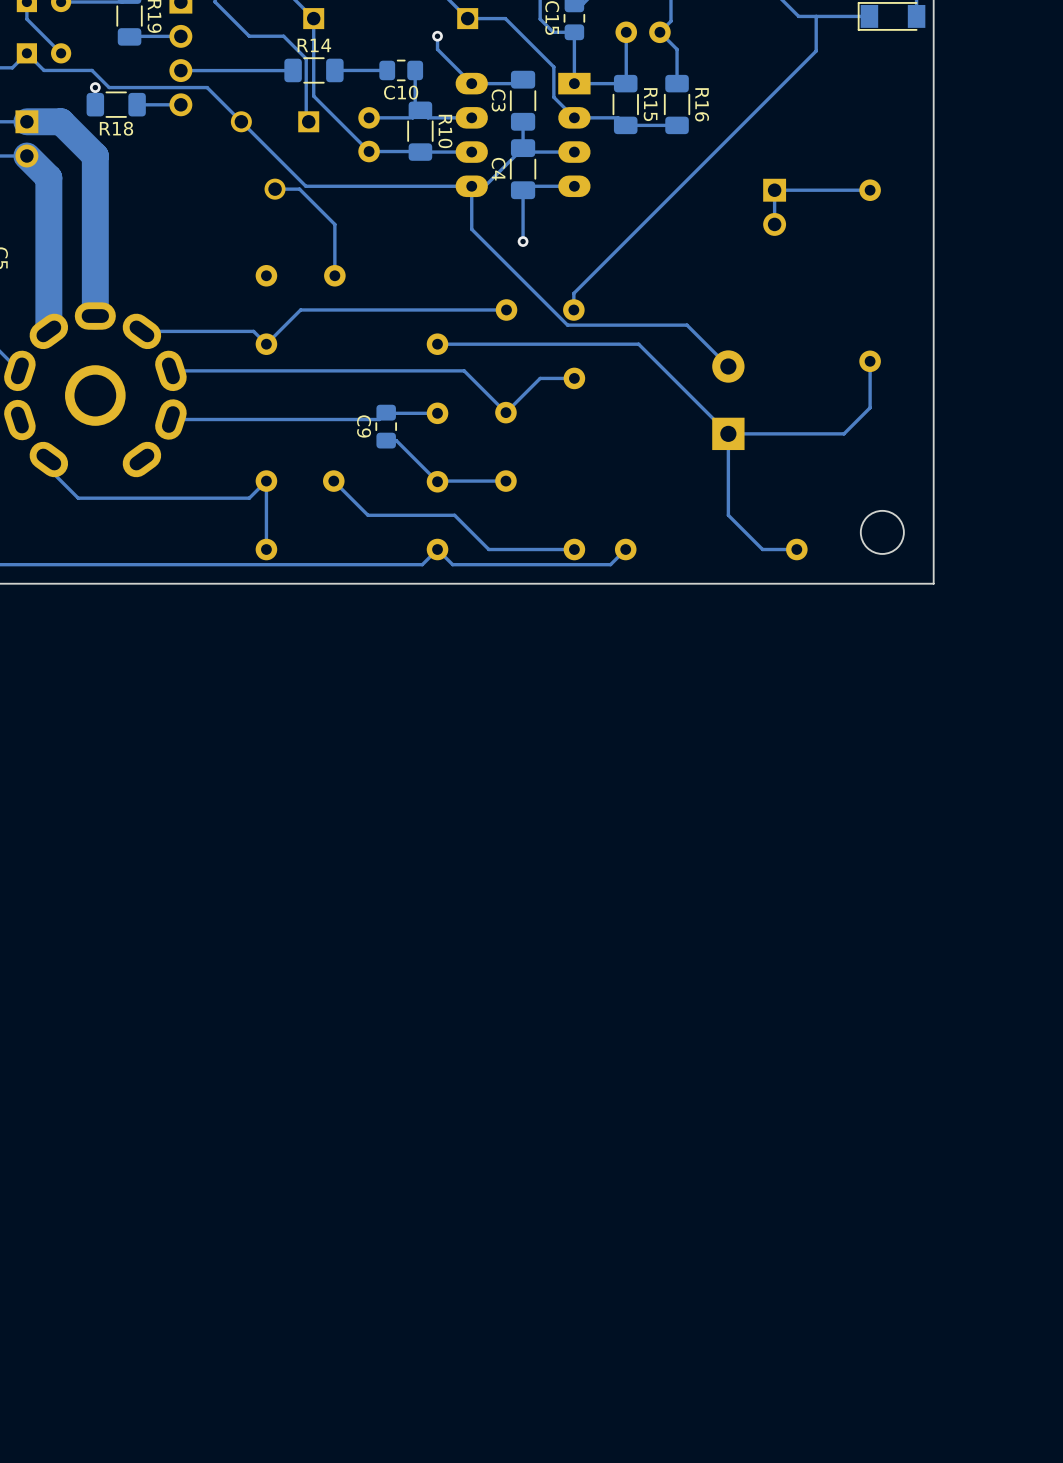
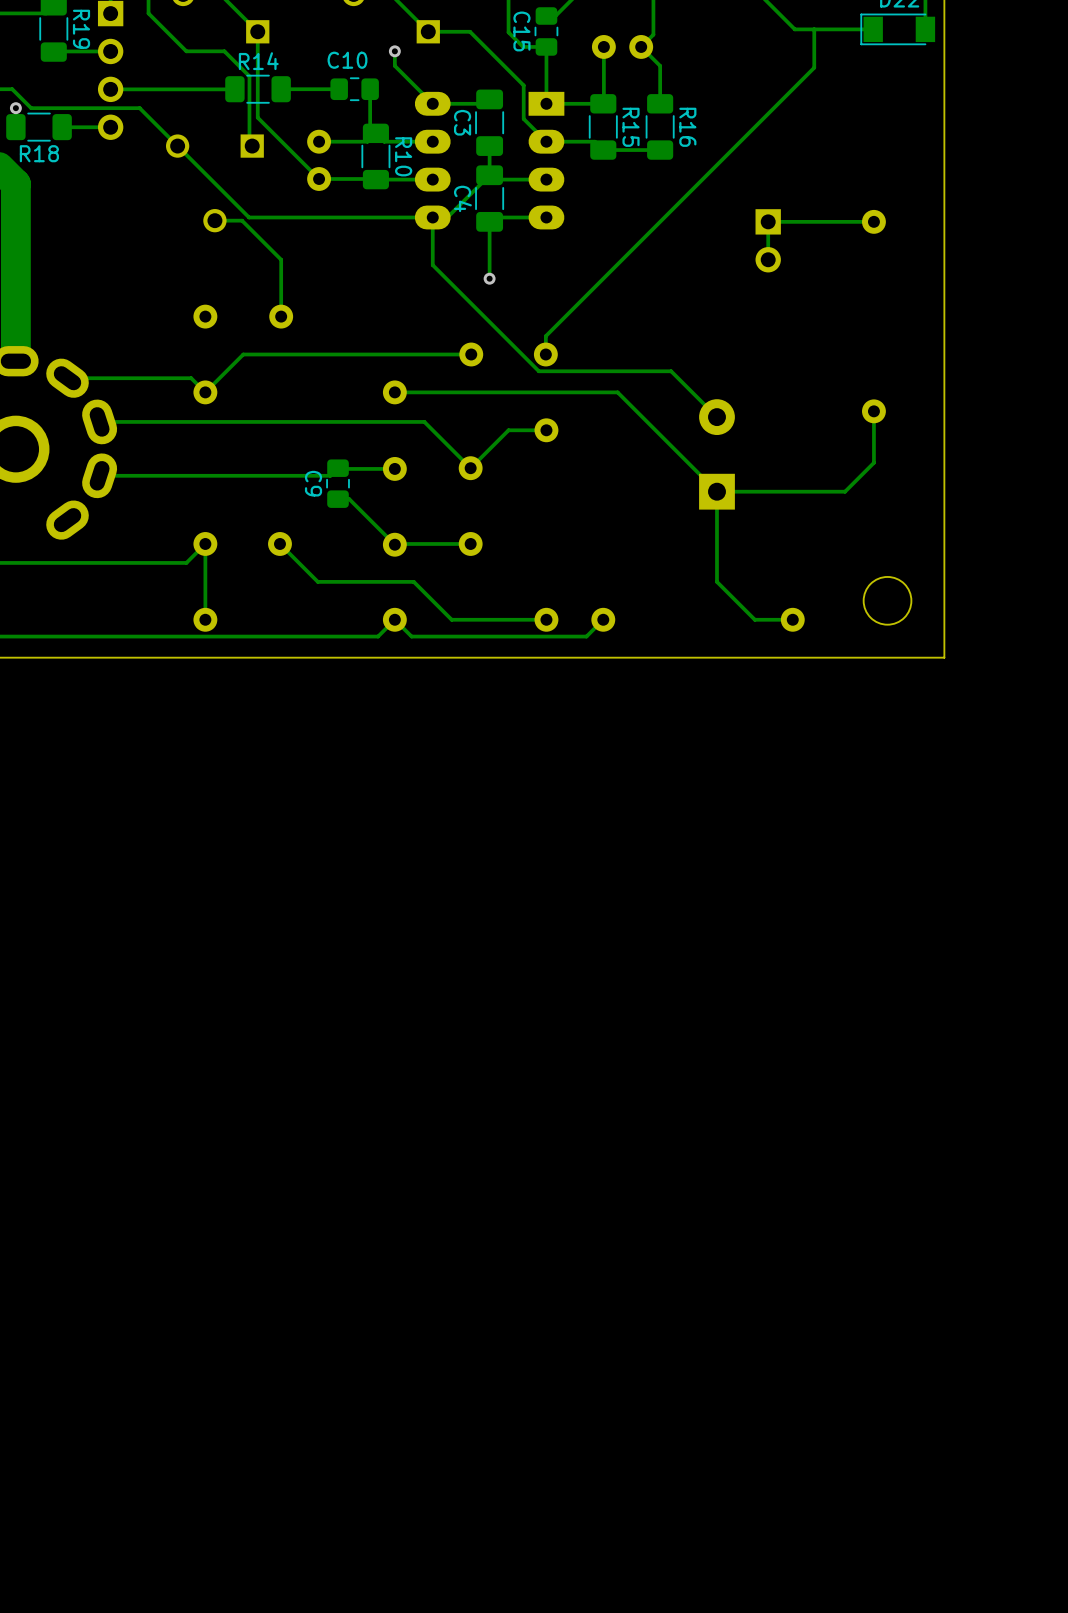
C10 name position: C10 (401, 92) -> C10 (347, 60)

